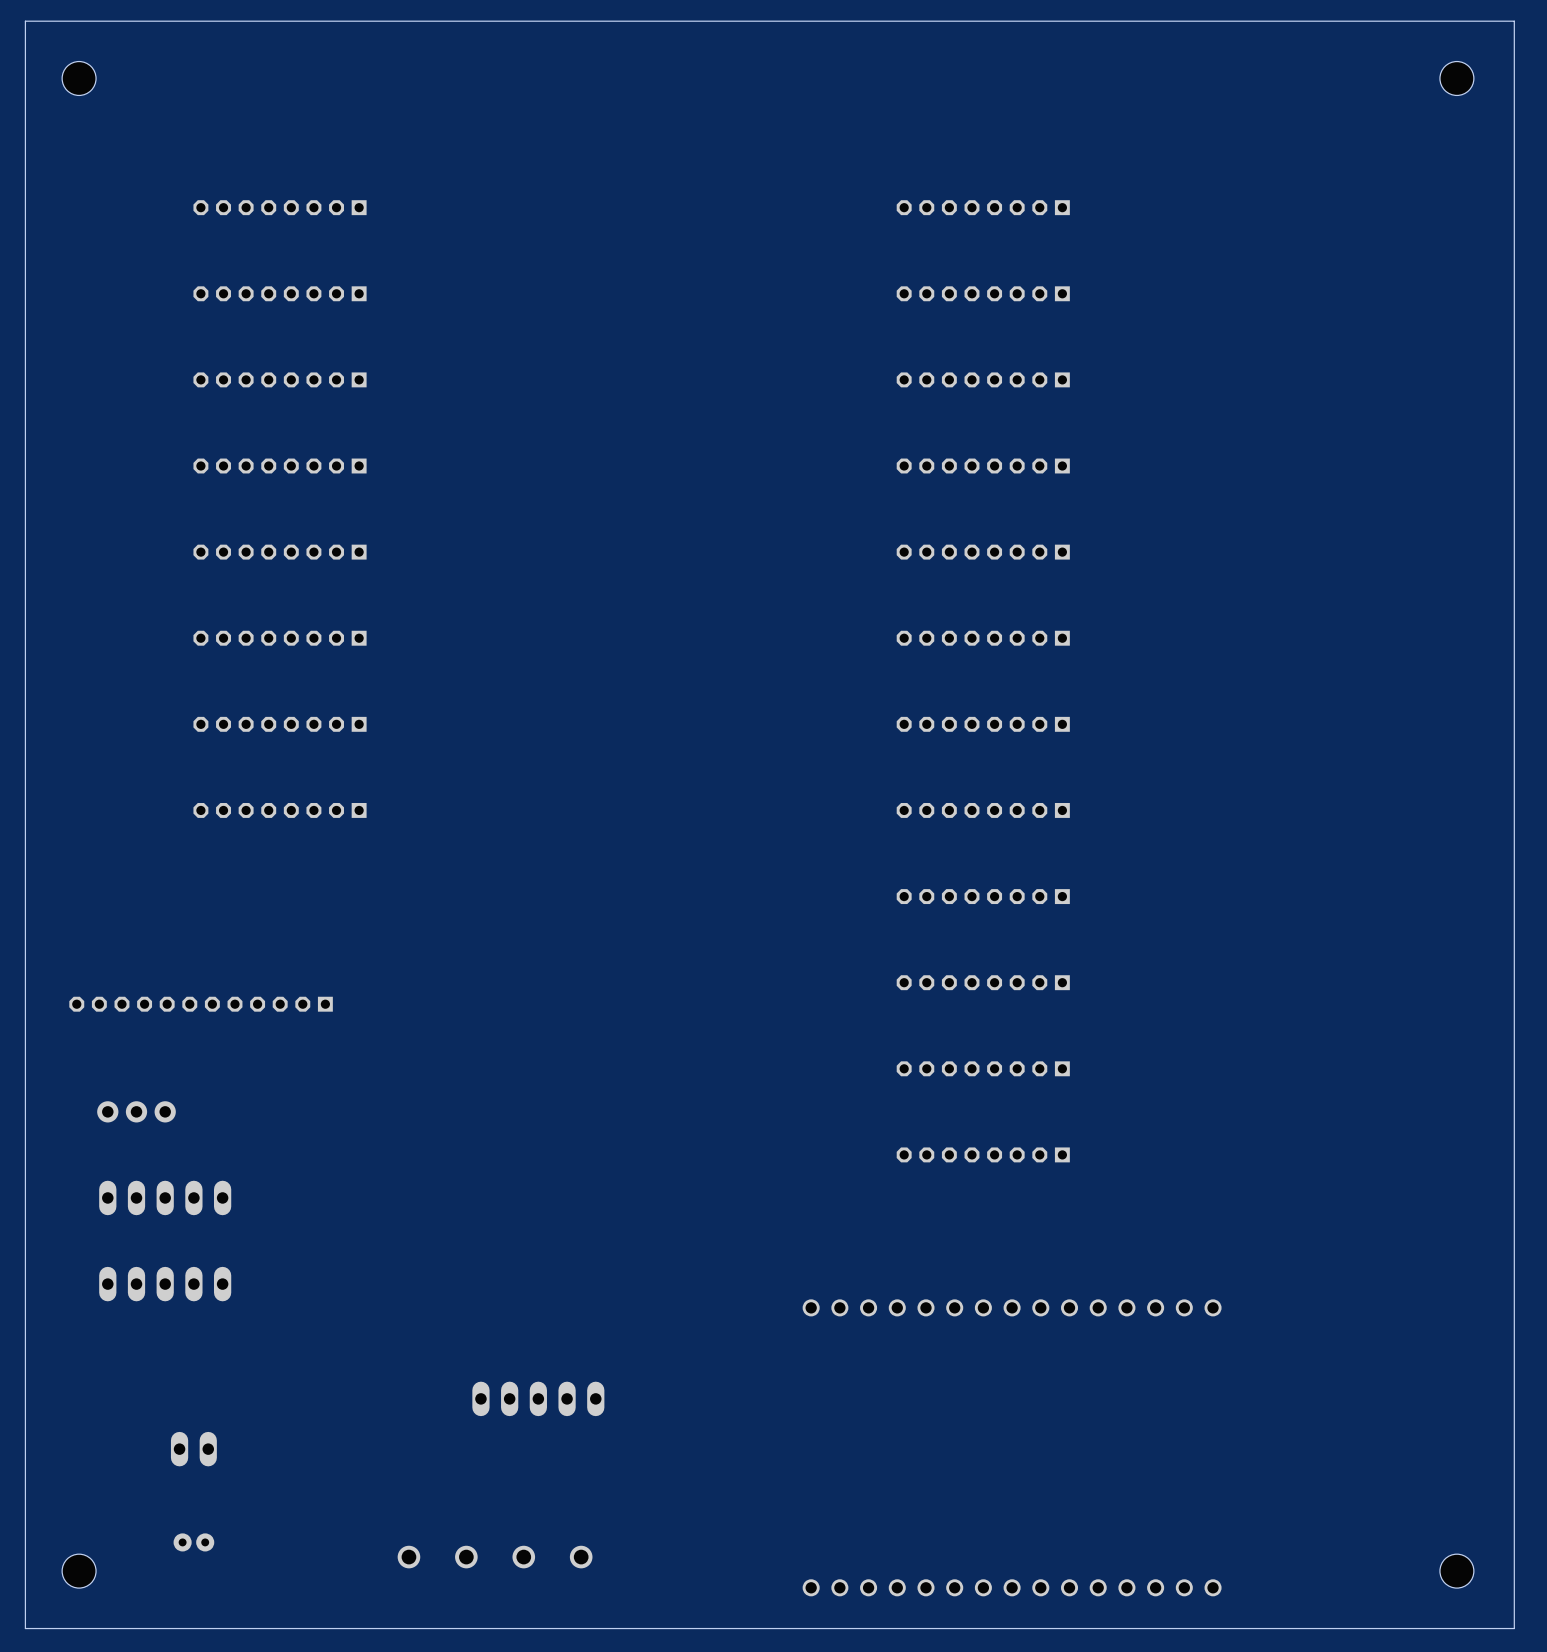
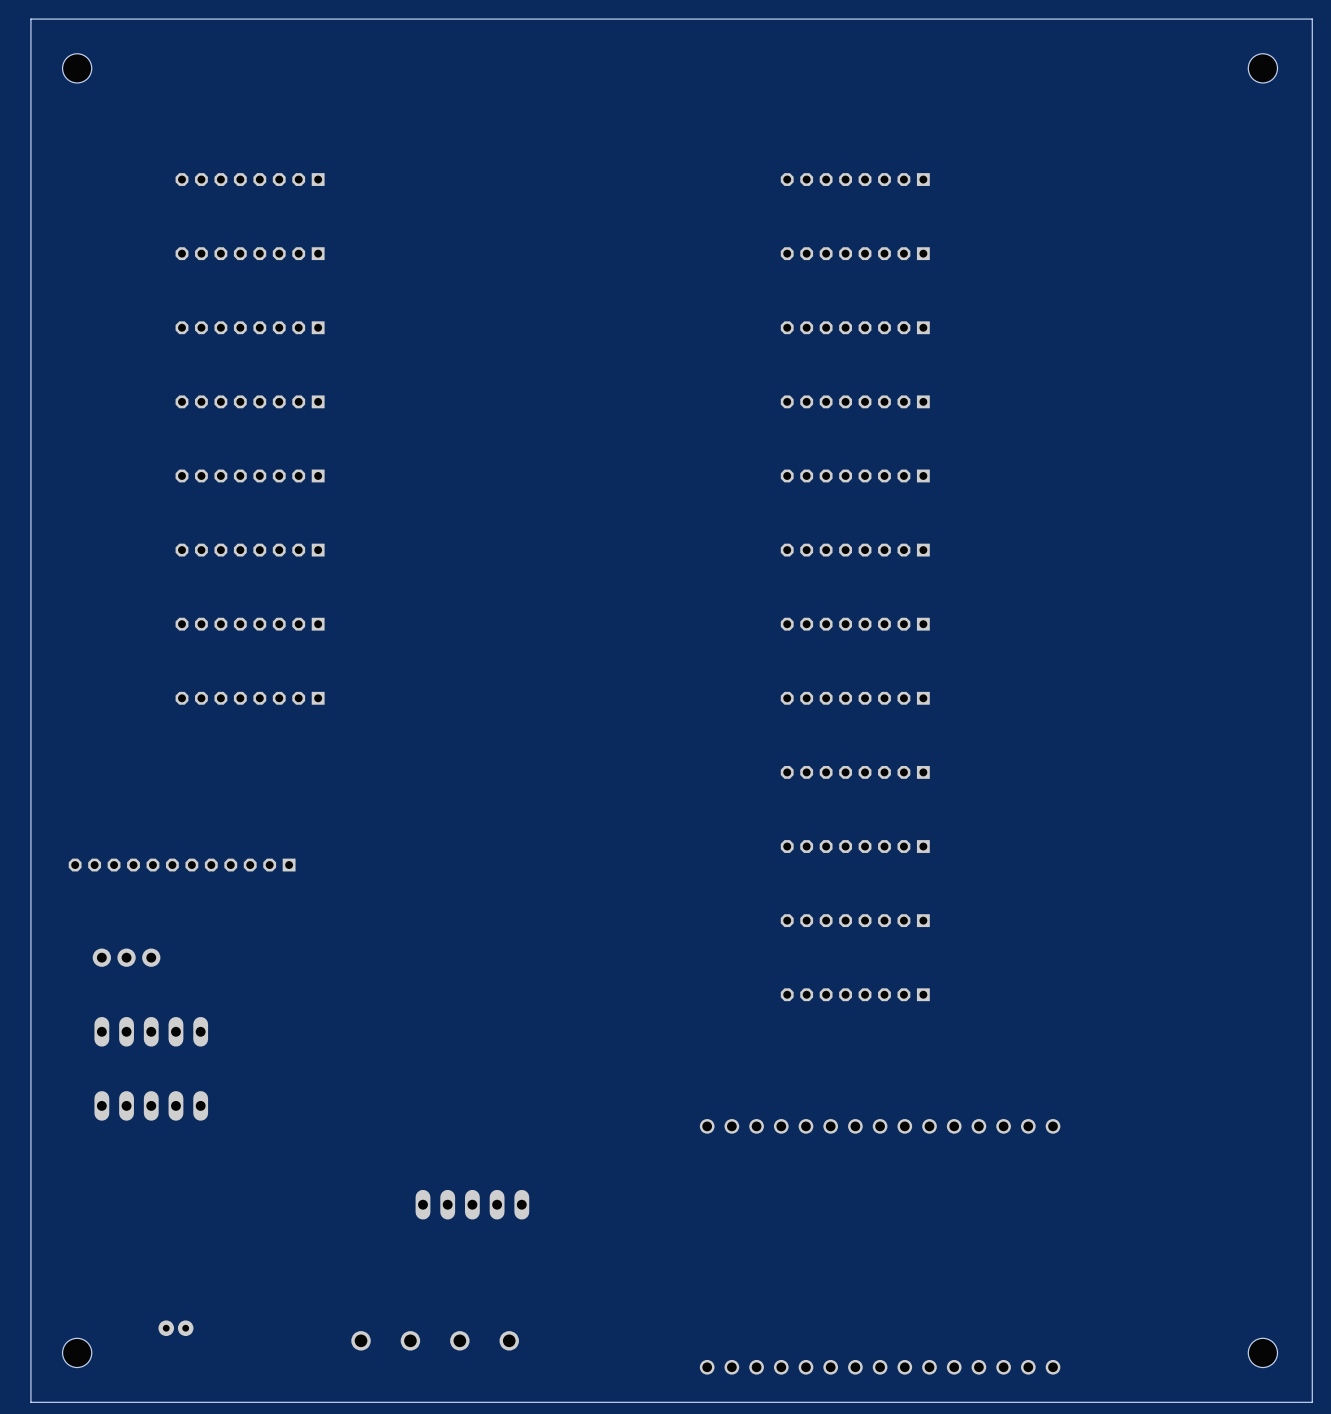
part: (193, 1449) -> none

